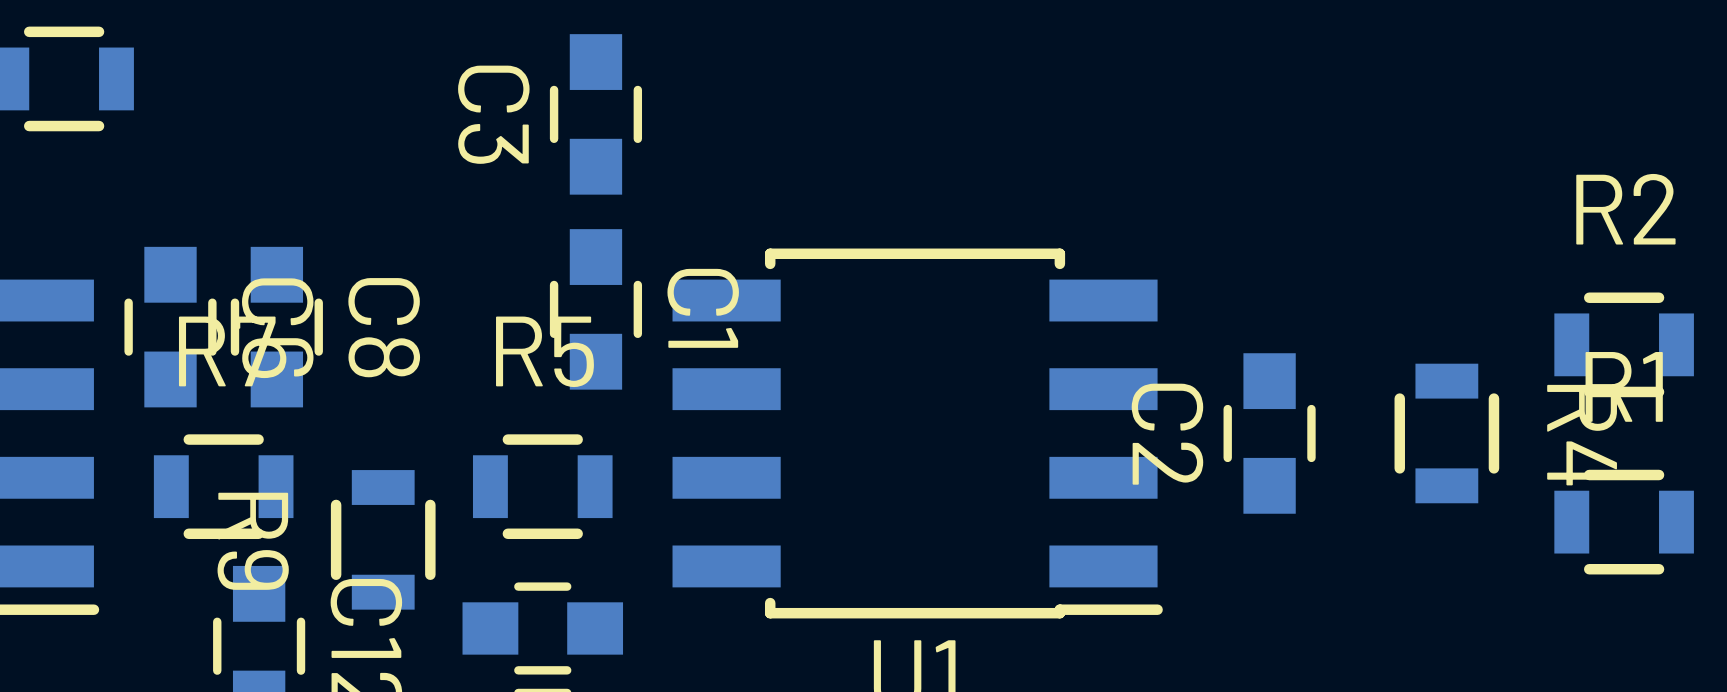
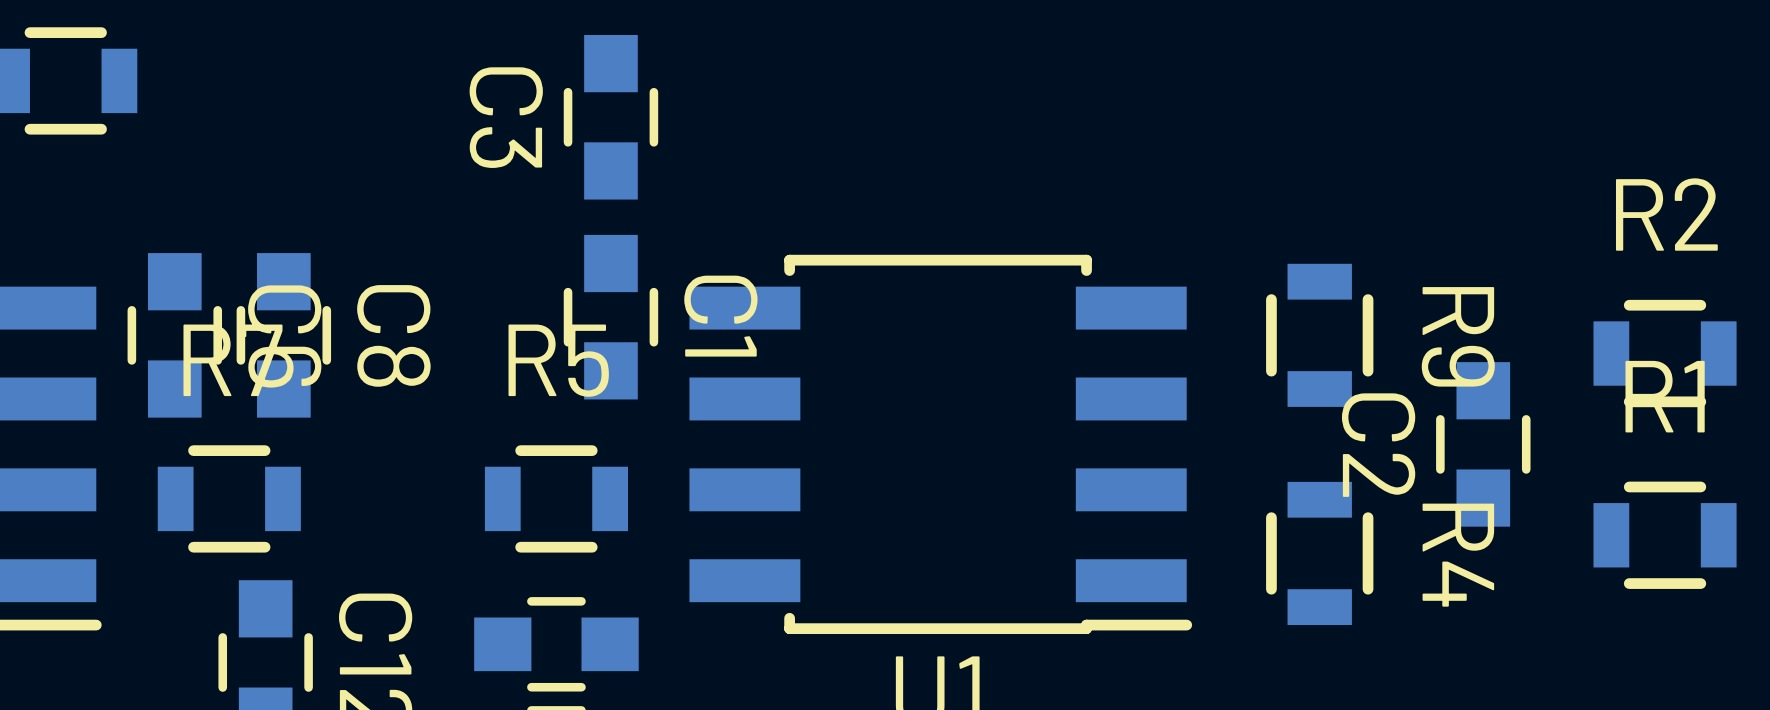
C2 position: (1269, 433) -> (1483, 444)
R4 position: (1446, 433) -> (1319, 553)
R9 position: (383, 539) -> (1319, 335)
R9 name position: R9 (253, 541) -> R9 (1458, 336)

